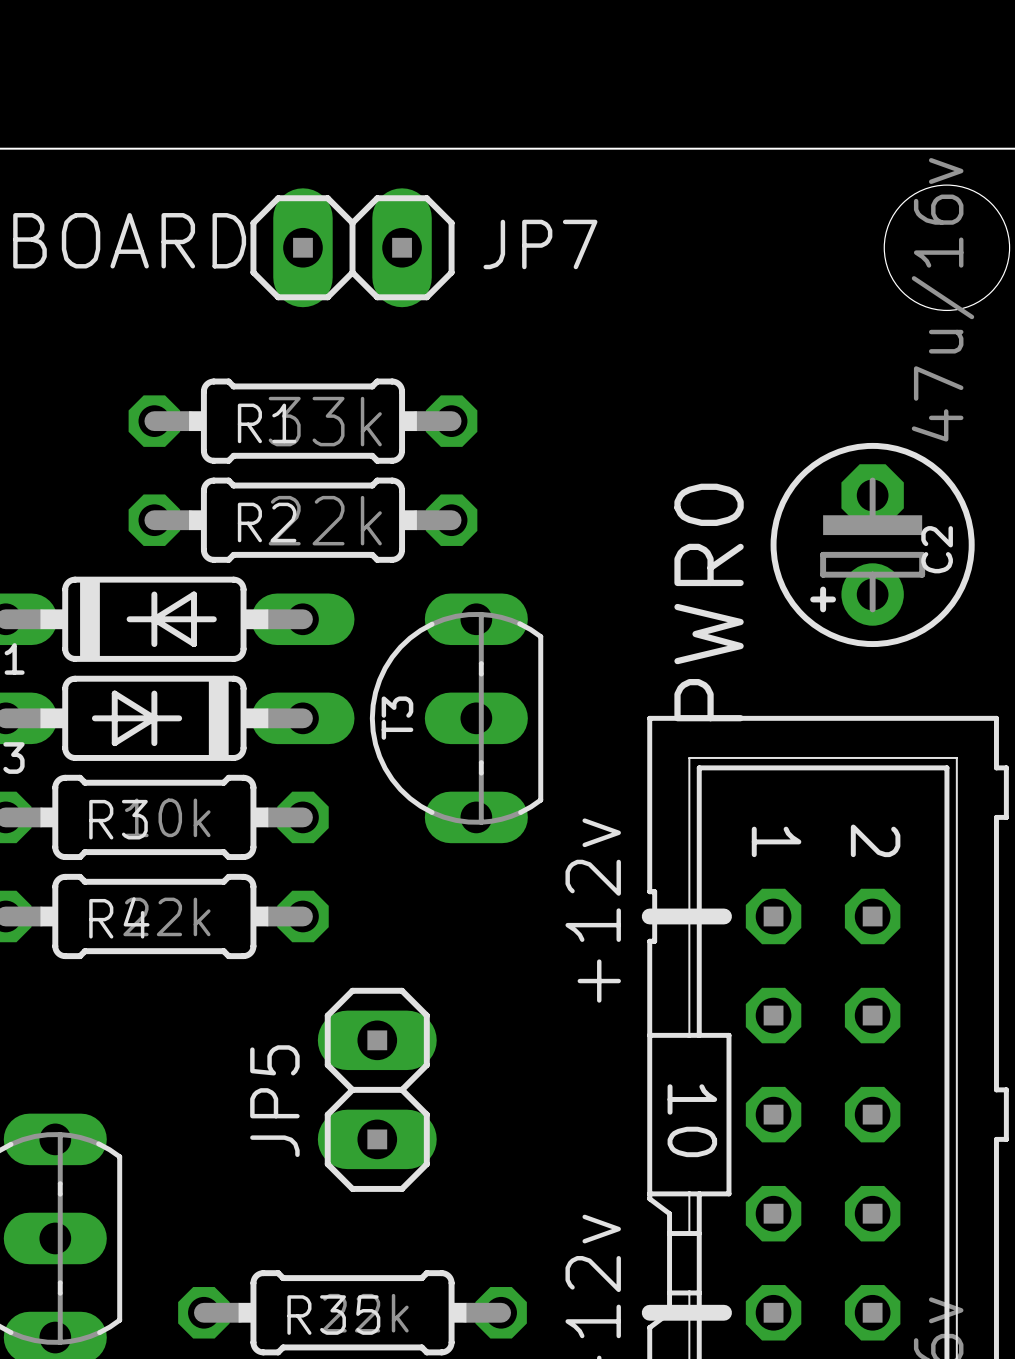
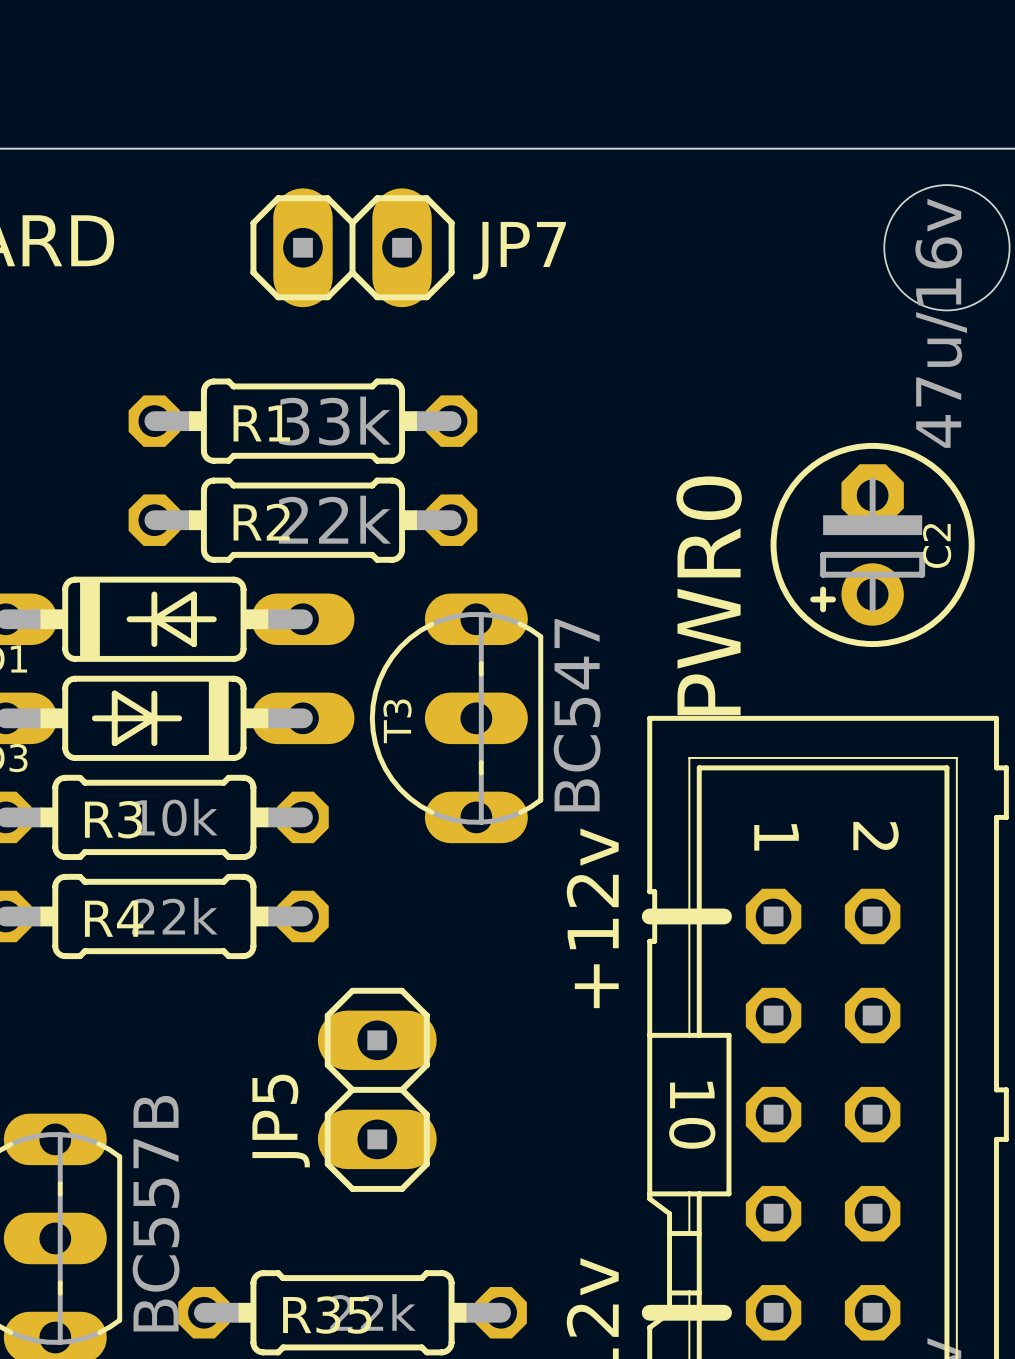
T3 value: none -> BC547 (577, 715)
part value: none -> BC557B (156, 1213)

